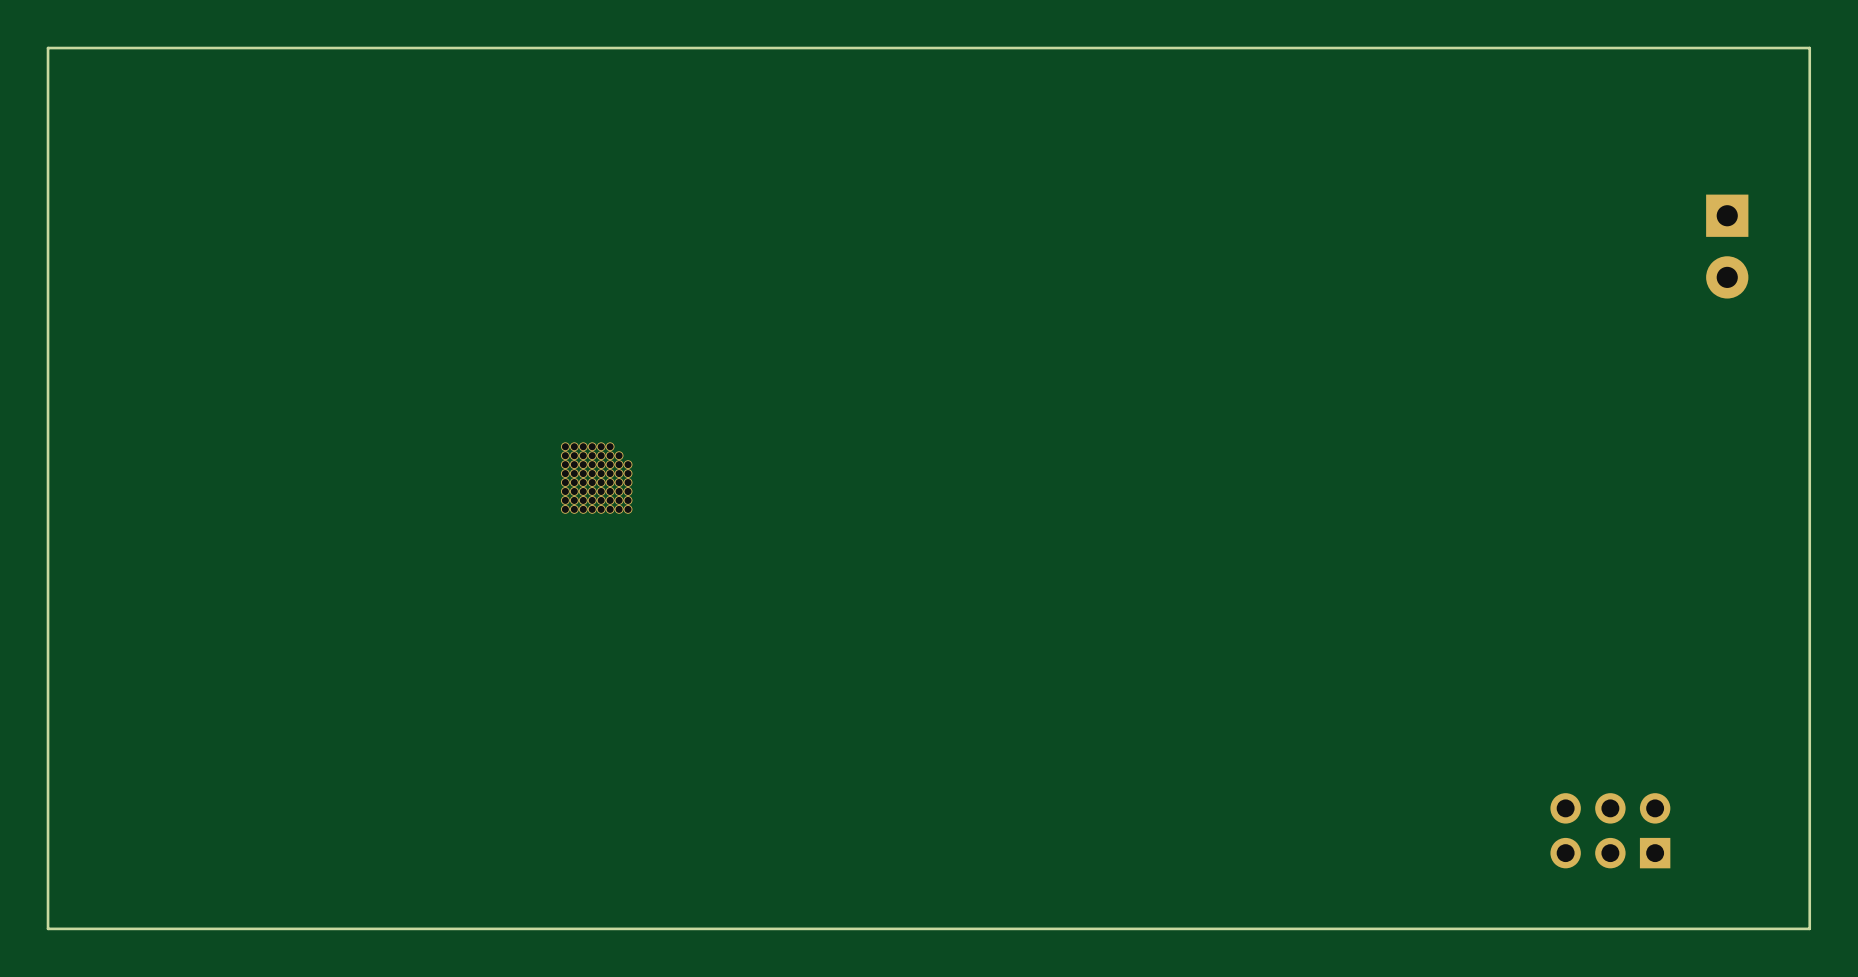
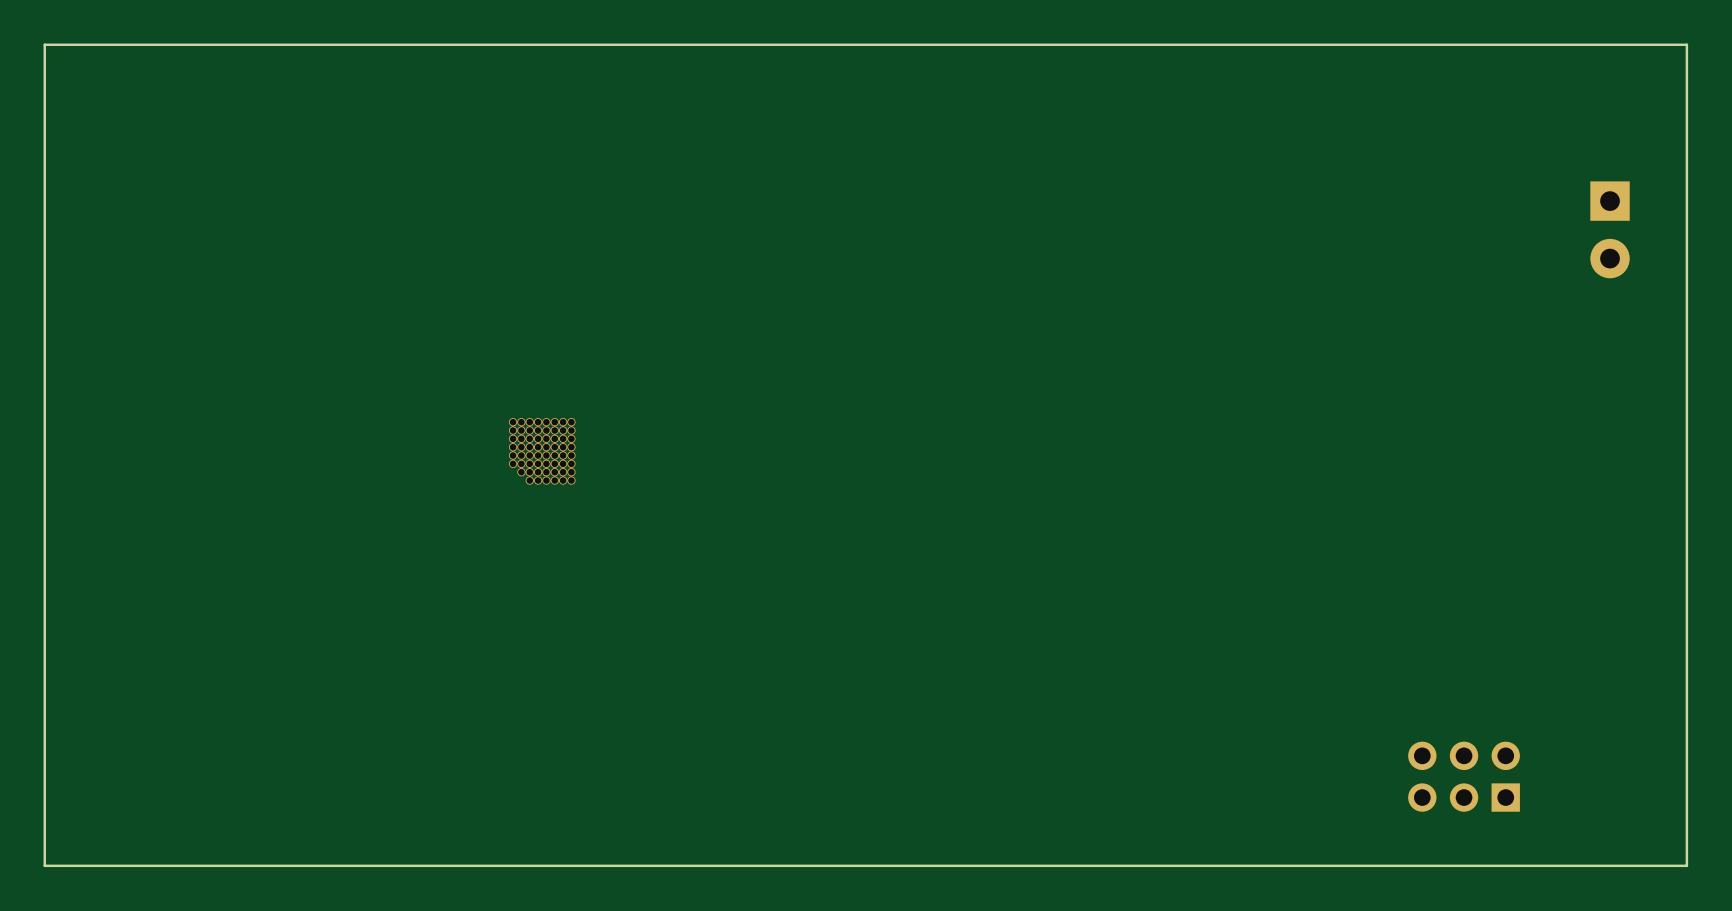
part rotation: 0° (596, 478) -> 180° (542, 451)
part position: (1610, 830) -> (1464, 776)

